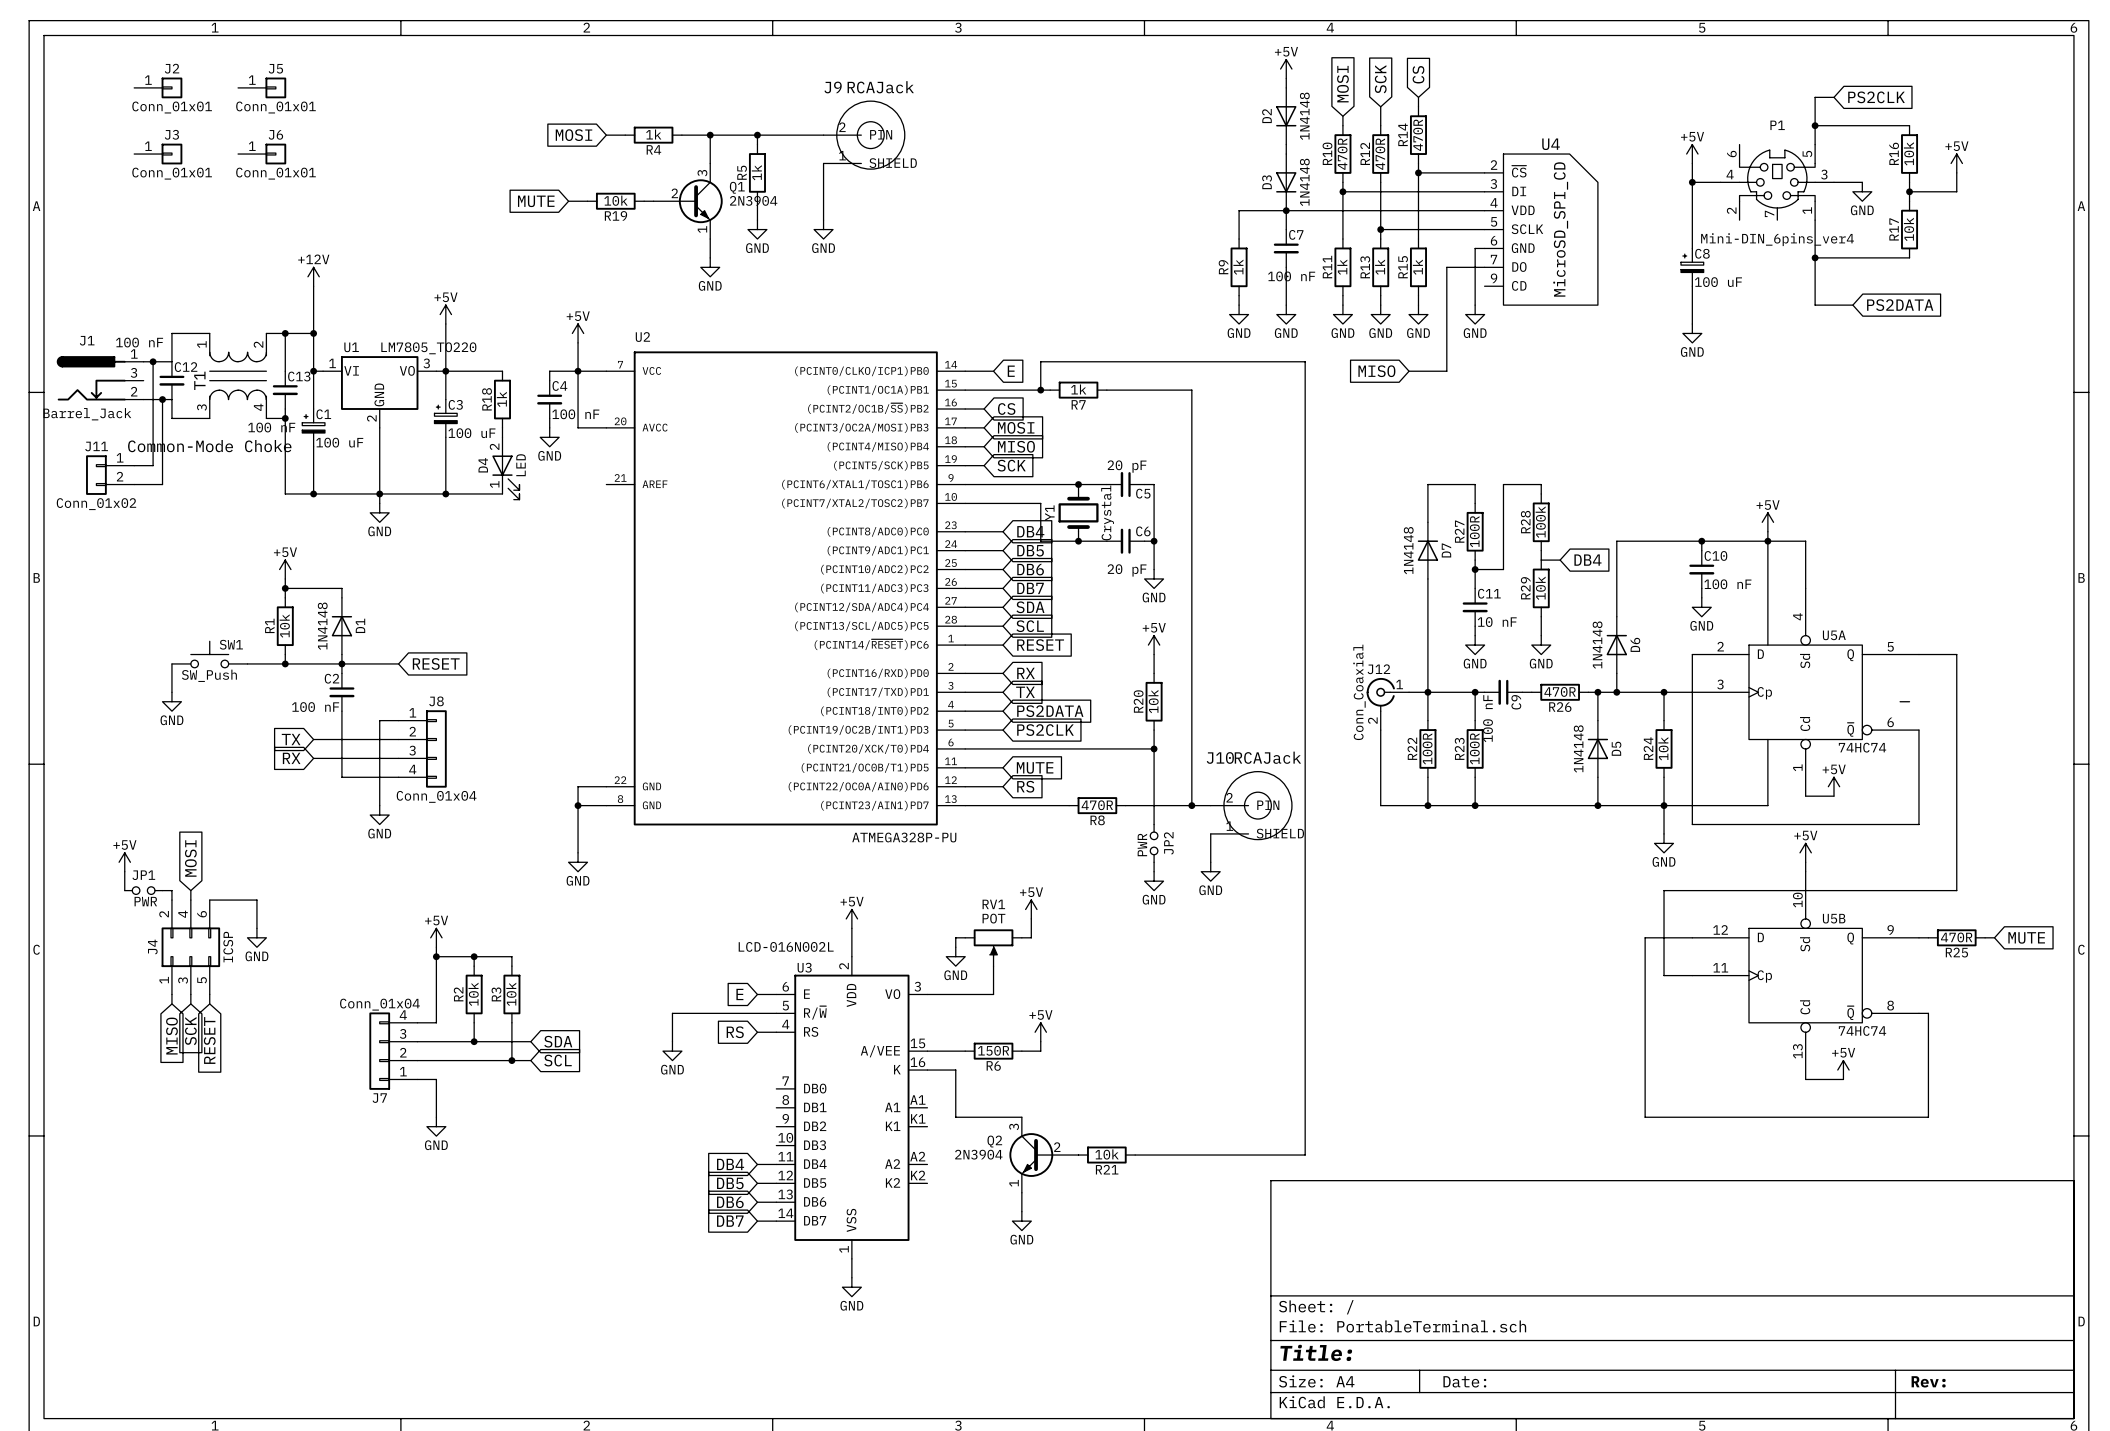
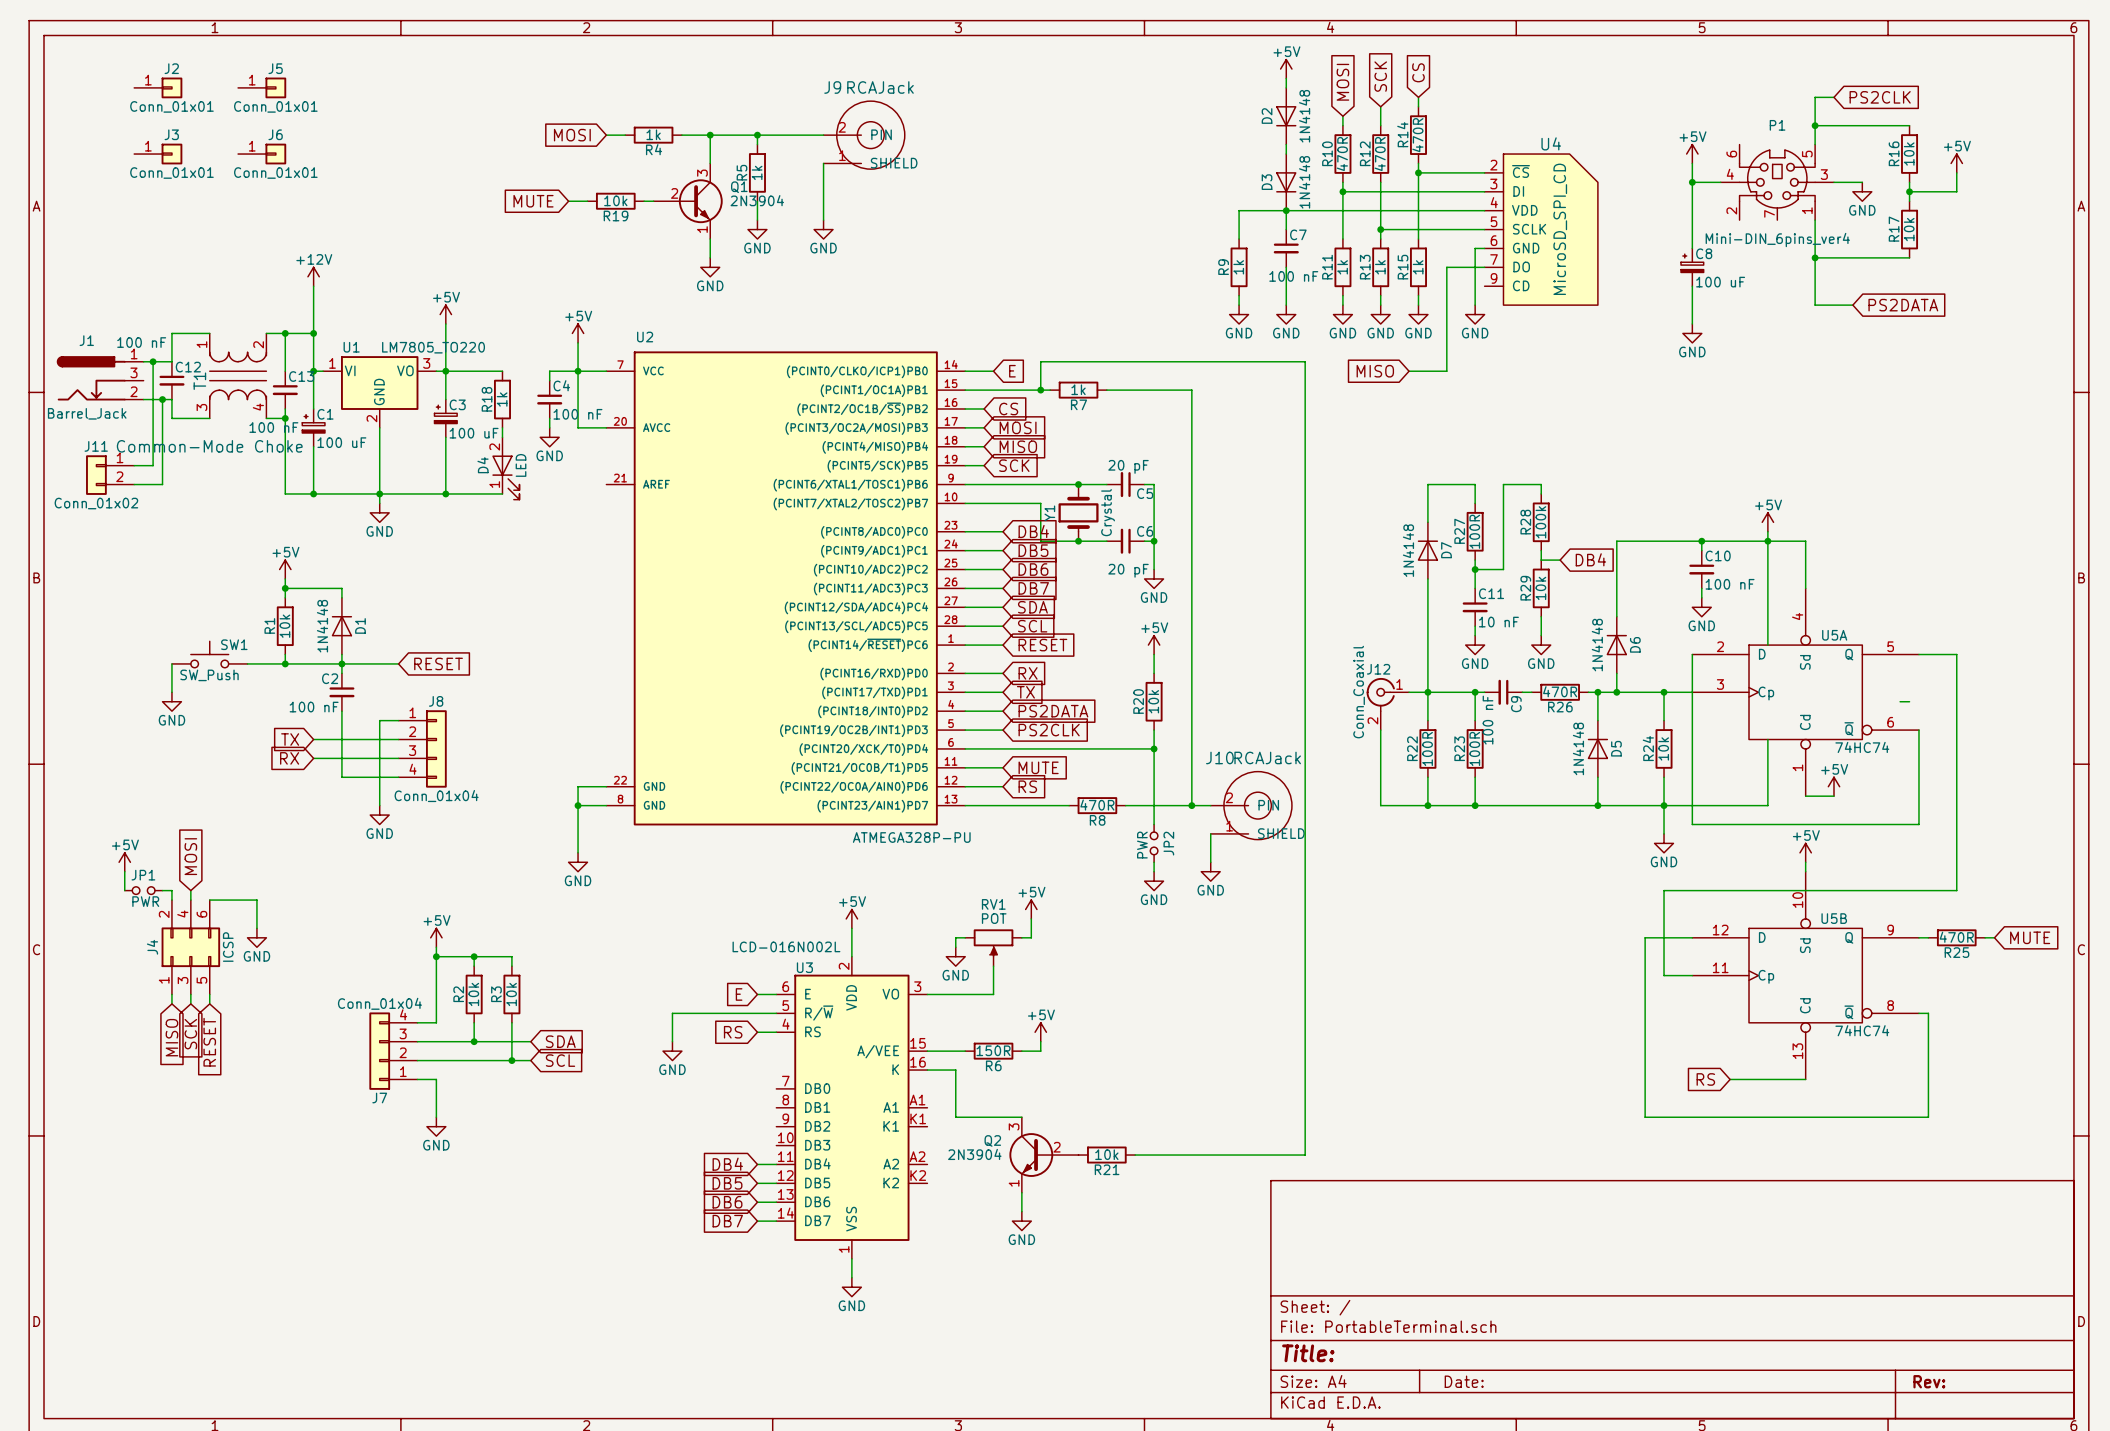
power symbol: +5V (1843, 1070) -> none
global label: none -> RS (1705, 1079)
wire: (1805, 1079) (1843, 1079) -> (1805, 1079) (1730, 1079)

